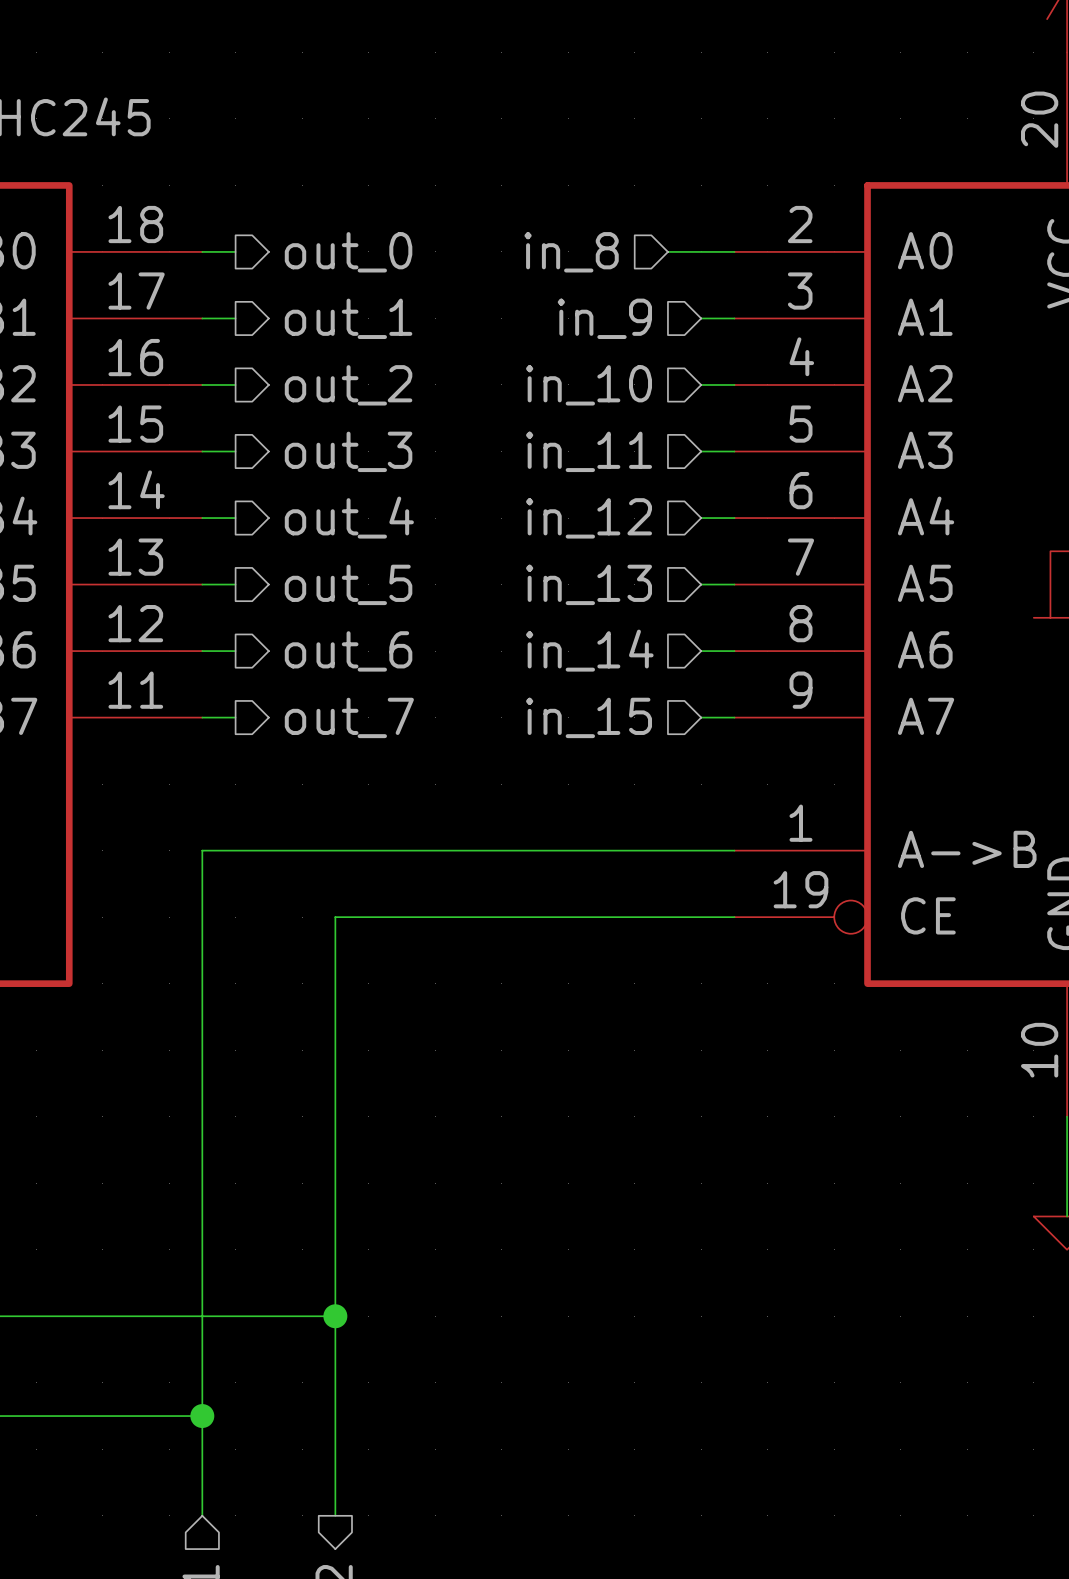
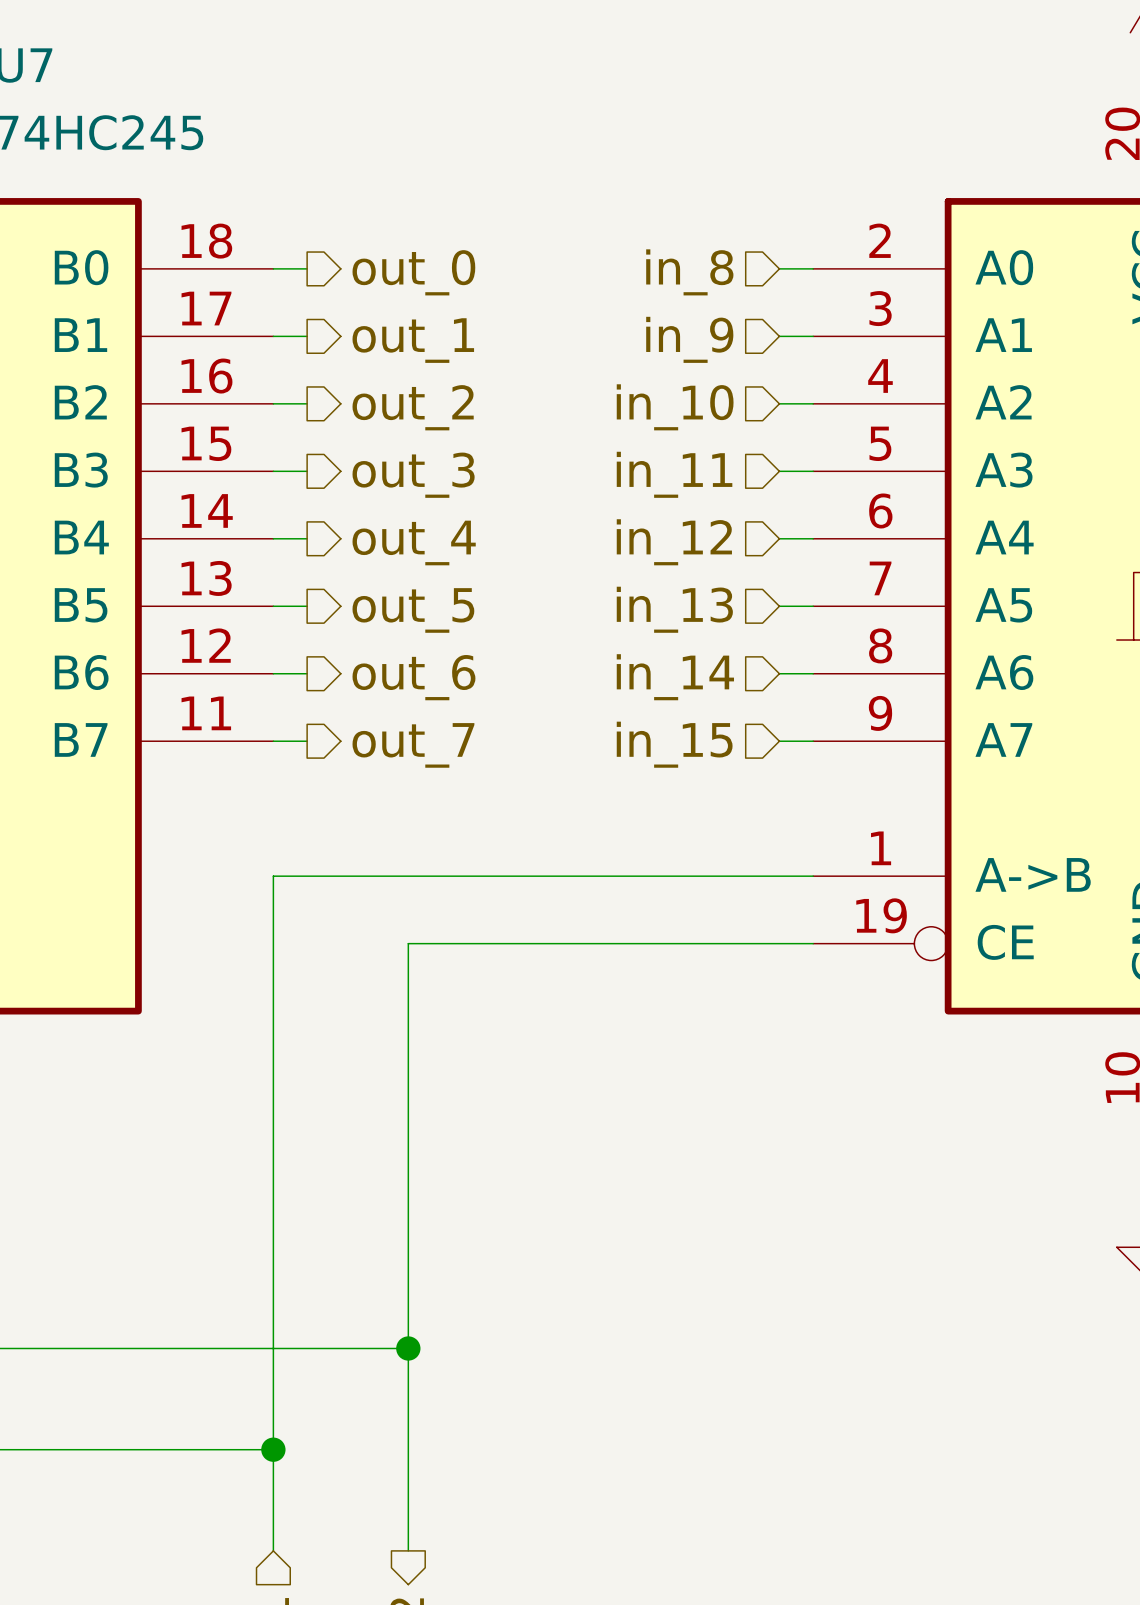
wire: (667, 251) (701, 251) -> none
hierarchical label position: in_8 (571, 252) -> in_8 (689, 272)

